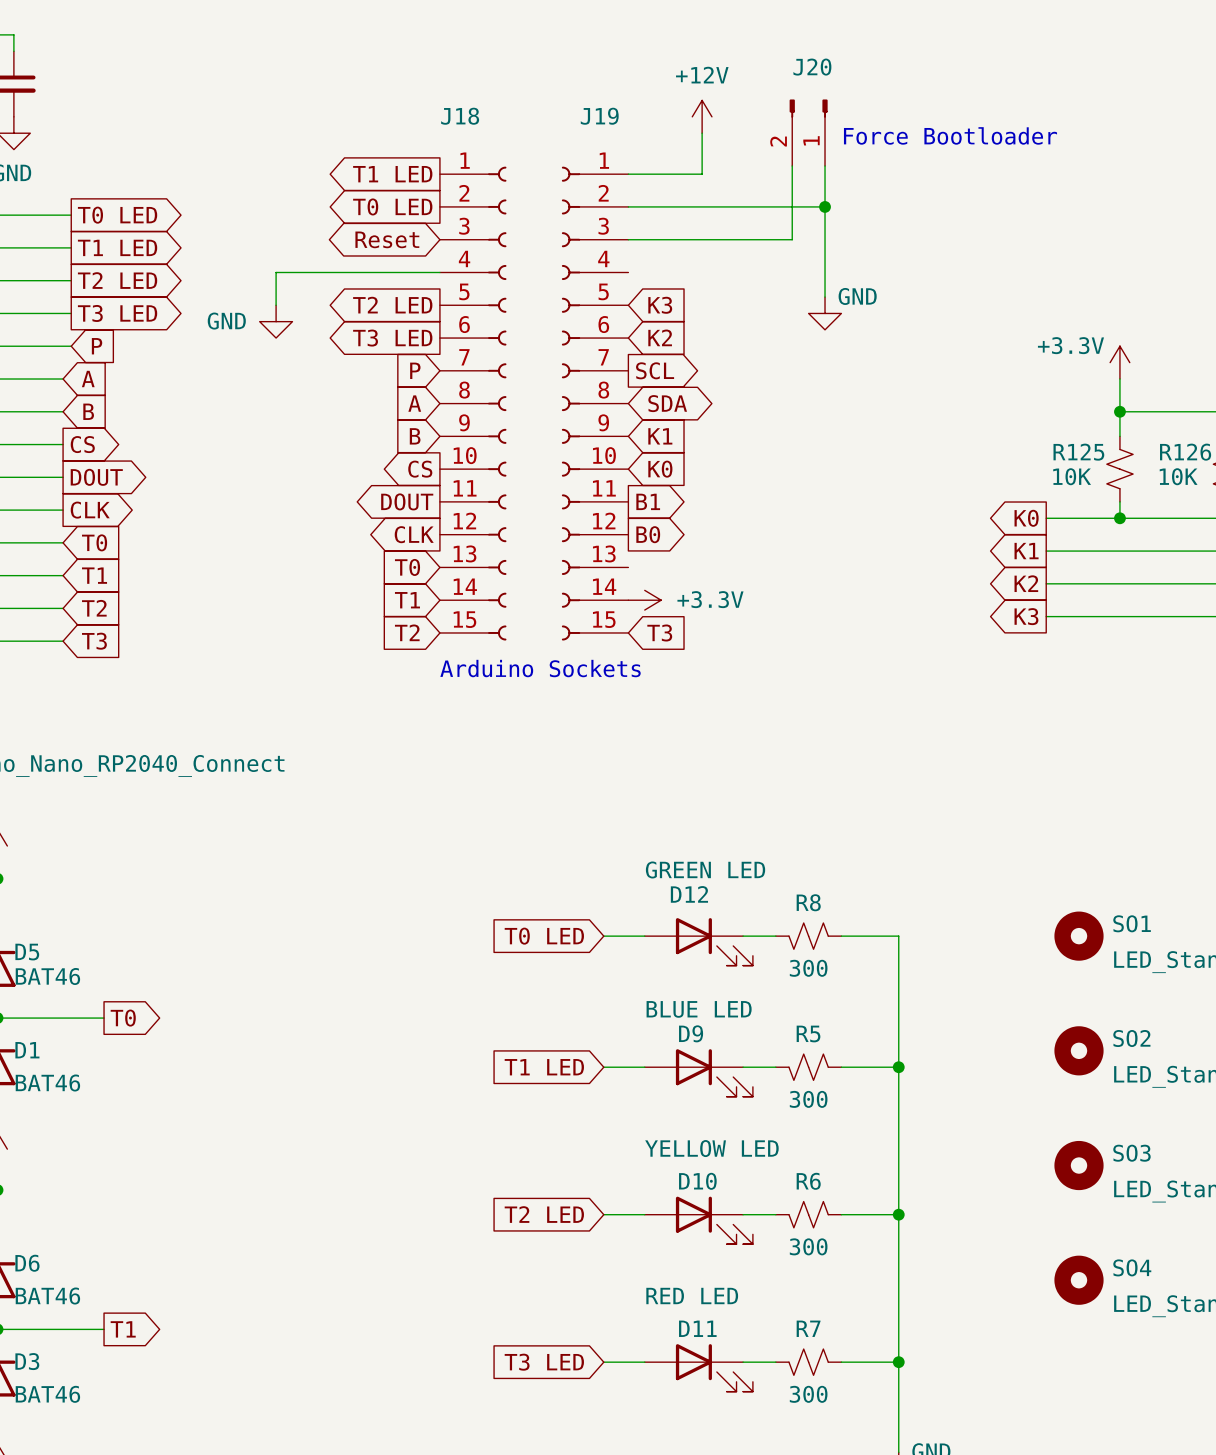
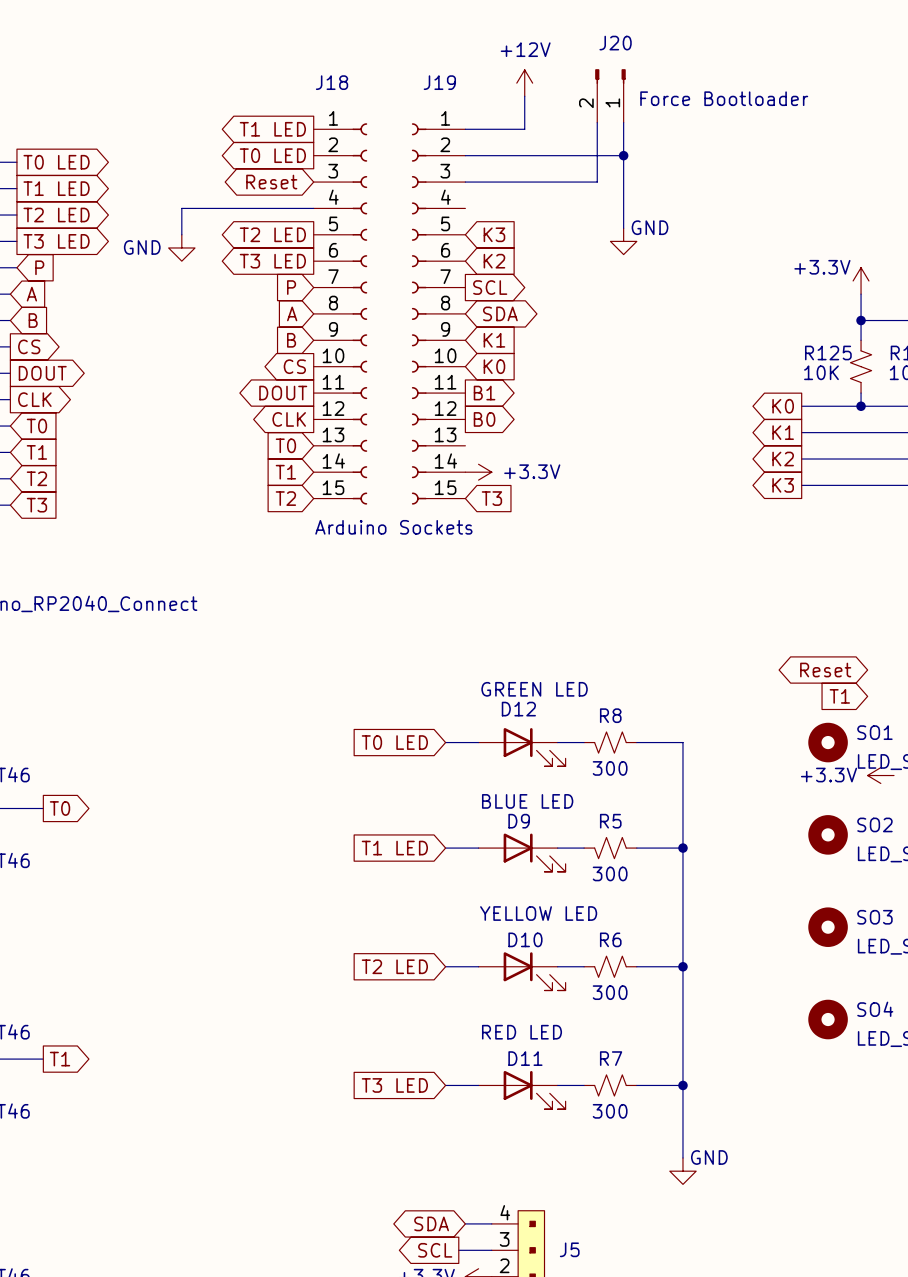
global label: none -> Reset (825, 670)
global label: none -> T1 (839, 696)
power symbol: none -> +3.3V (880, 775)

